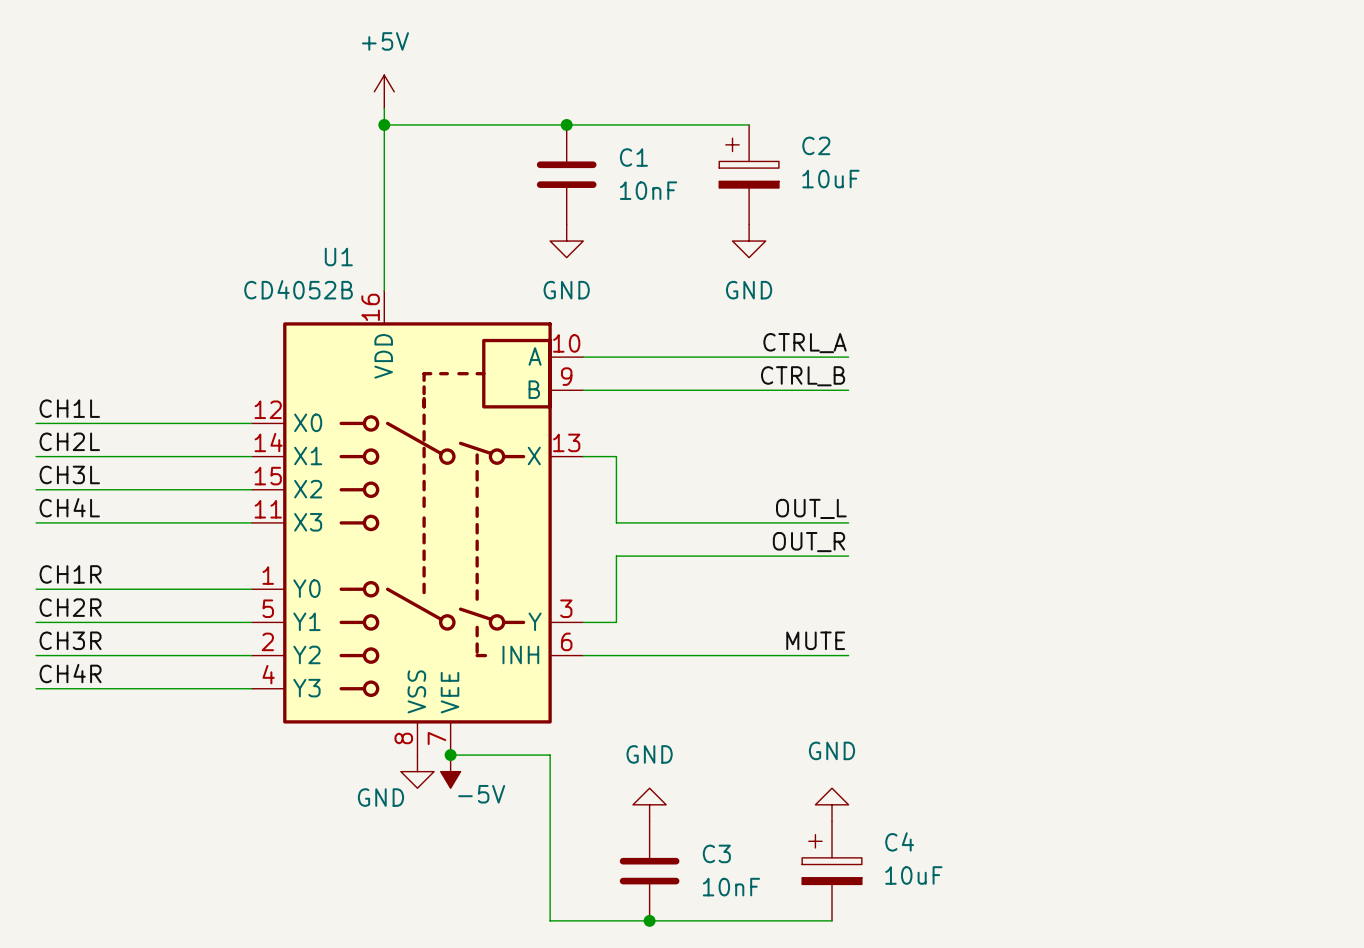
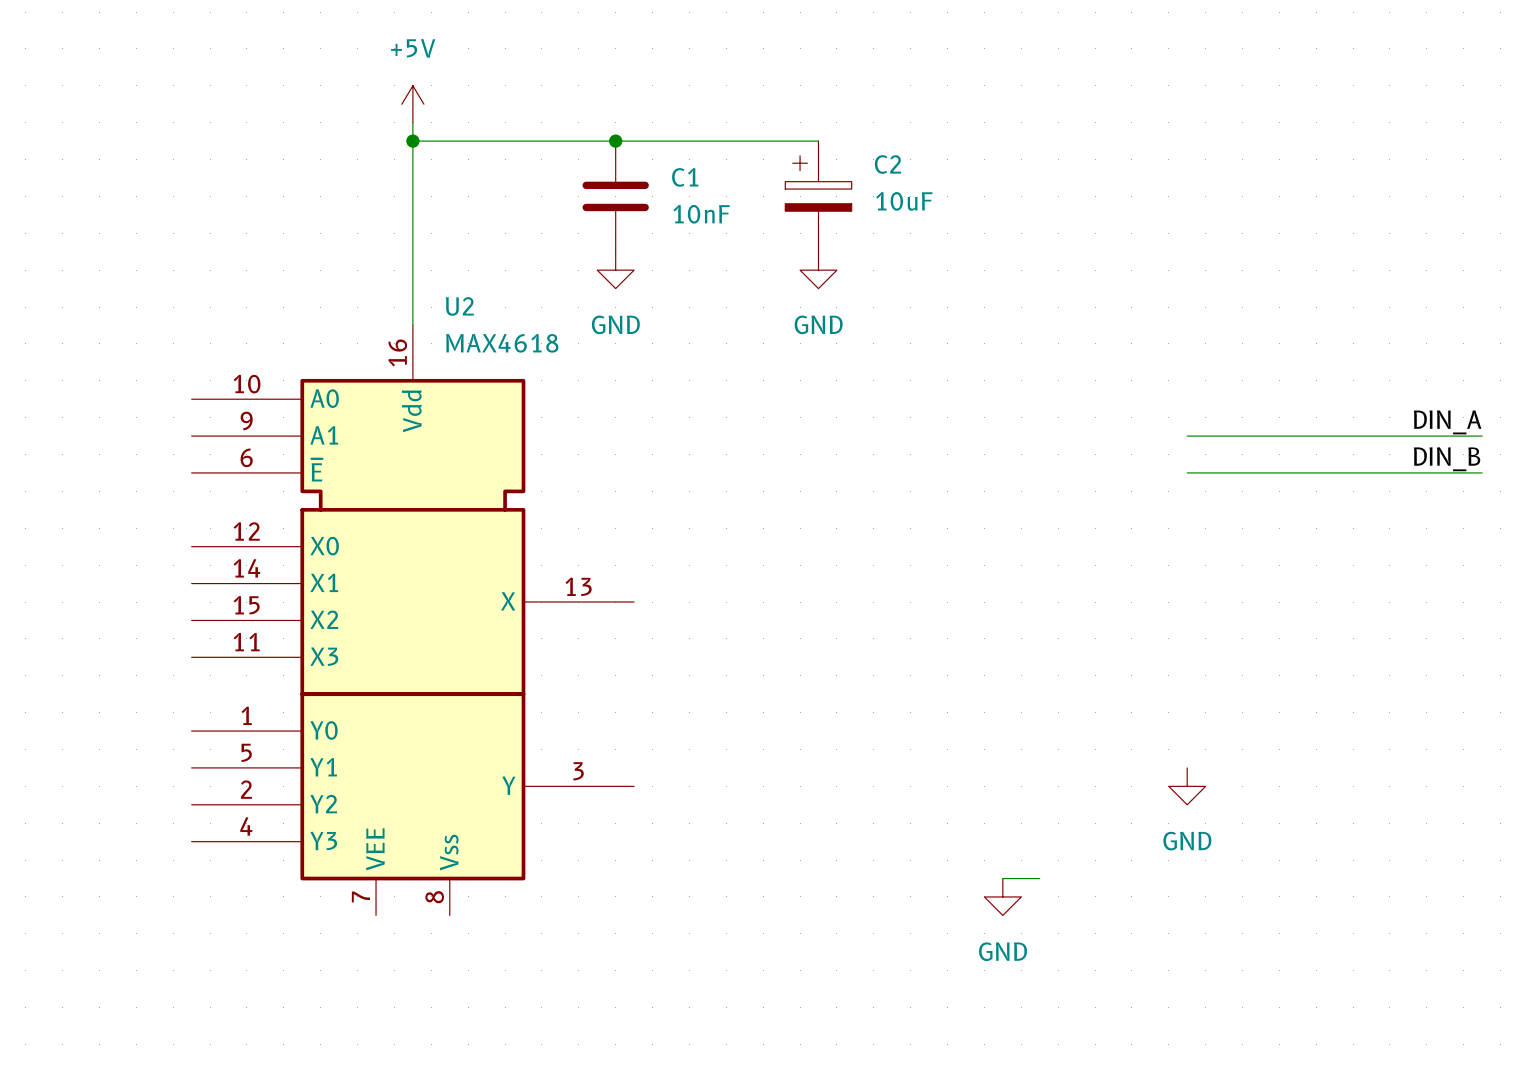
label: CTRL_A (805, 343) -> none
wire: (583, 357) (848, 357) -> none
label: CTRL_B (803, 376) -> none
label: none -> DIN_A (1447, 422)
wire: (583, 390) (848, 390) -> none
wire: none -> (1187, 436) (1482, 436)
label: CH1L (69, 408) -> none
label: none -> DIN_B (1447, 459)
wire: (36, 423) (251, 423) -> none
wire: none -> (1187, 472) (1482, 472)
label: CH2L (69, 441) -> none
wire: (36, 456) (251, 456) -> none
wire: (583, 456) (616, 456) (616, 522) (848, 522) -> none
label: CH3L (69, 474) -> none
wire: (36, 489) (251, 489) -> none
label: CH4L (69, 507) -> none
label: OUT_L (811, 508) -> none
wire: (36, 522) (251, 522) -> none
U1: CD4052B (417, 522) -> none
label: OUT_R (808, 542) -> none
U2: none -> MAX4618 (412, 620)
wire: (848, 556) (616, 556) (616, 622) (583, 622) -> none
label: CH1R (70, 574) -> none
wire: (36, 589) (251, 589) -> none
label: CH2R (70, 607) -> none
wire: (36, 622) (251, 622) -> none
label: CH3R (70, 640) -> none
label: MUTE (815, 640) -> none
wire: (36, 655) (251, 655) -> none
wire: (583, 655) (848, 655) -> none
label: CH4R (70, 673) -> none
wire: (36, 688) (251, 688) -> none
power symbol: none -> GND (1187, 786)
wire: (450, 755) (550, 755) (550, 920) (832, 920) -> none
junction: (450, 755) -> none
power symbol: GND (417, 771) -> none
power symbol: -5V (450, 771) -> none
wire: none -> (1002, 878) (1039, 878)
power symbol: GND (649, 804) -> none
power symbol rotation: 0° (832, 804) -> 180° (1002, 896)
power symbol position: GND (832, 804) -> GND (1002, 896)
C3: 10nF (649, 871) -> none
C4: 10uF (832, 871) -> none
junction: (649, 920) -> none

